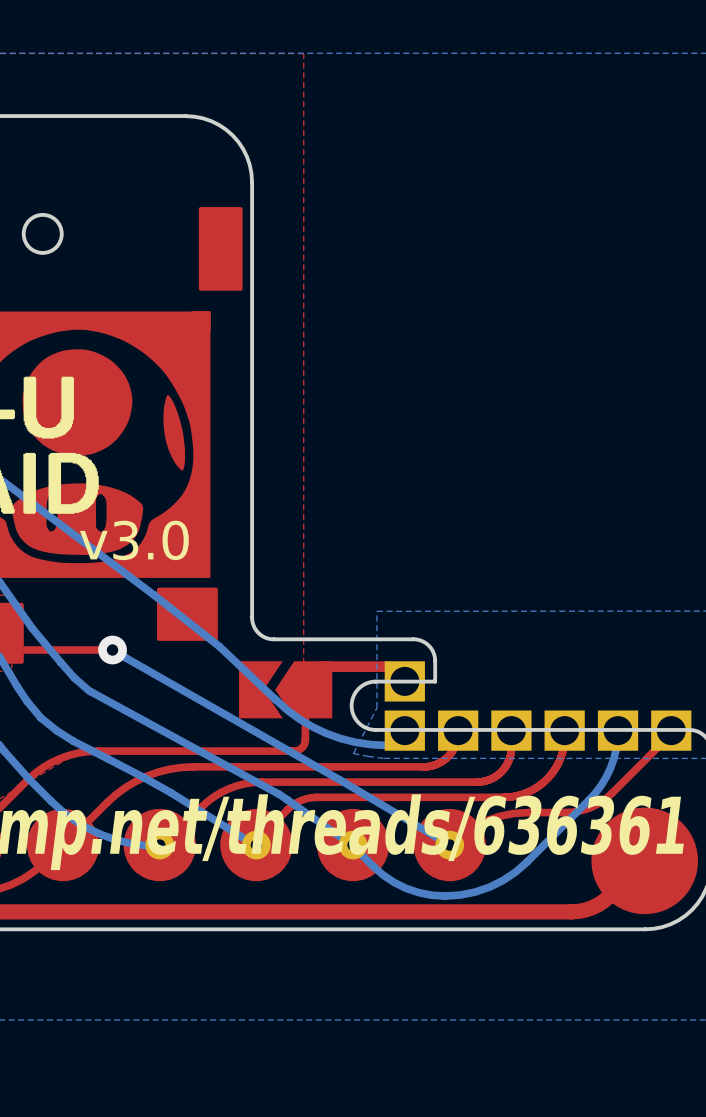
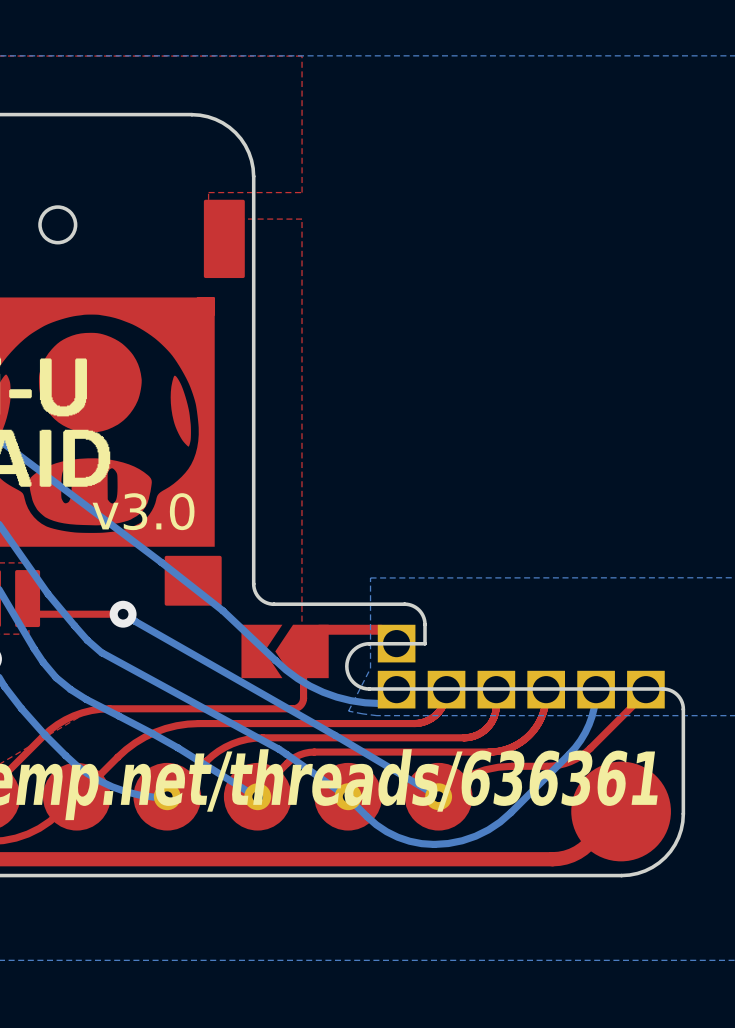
top zone outline: (303, 53) (303, 227) -> (302, 56) (302, 192) (208, 192) (208, 219) (302, 219)

